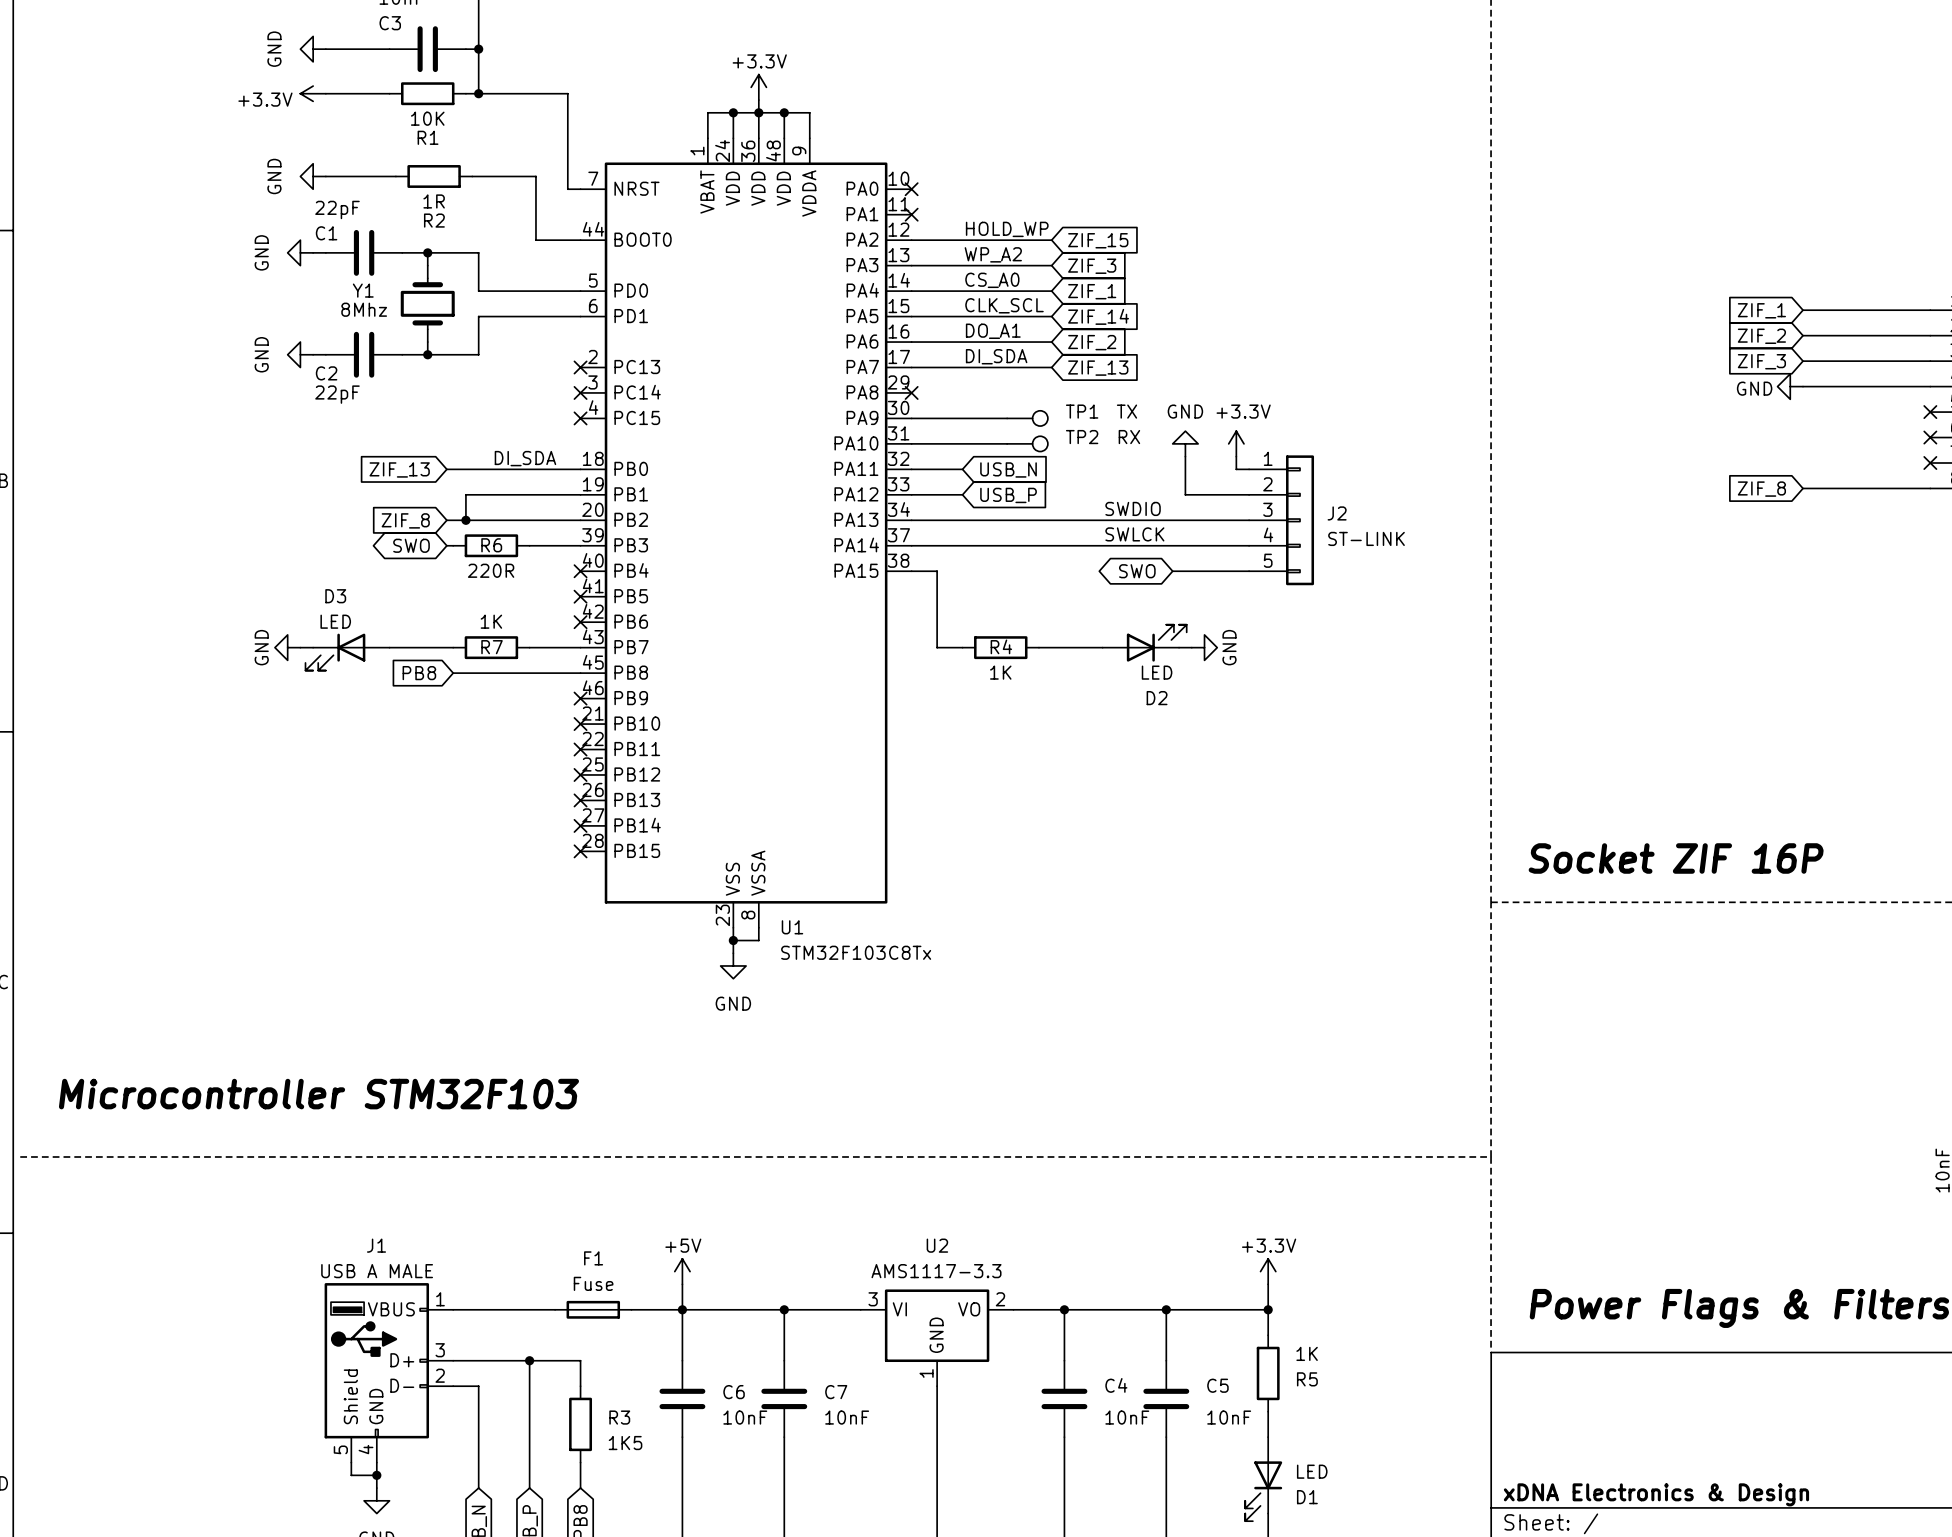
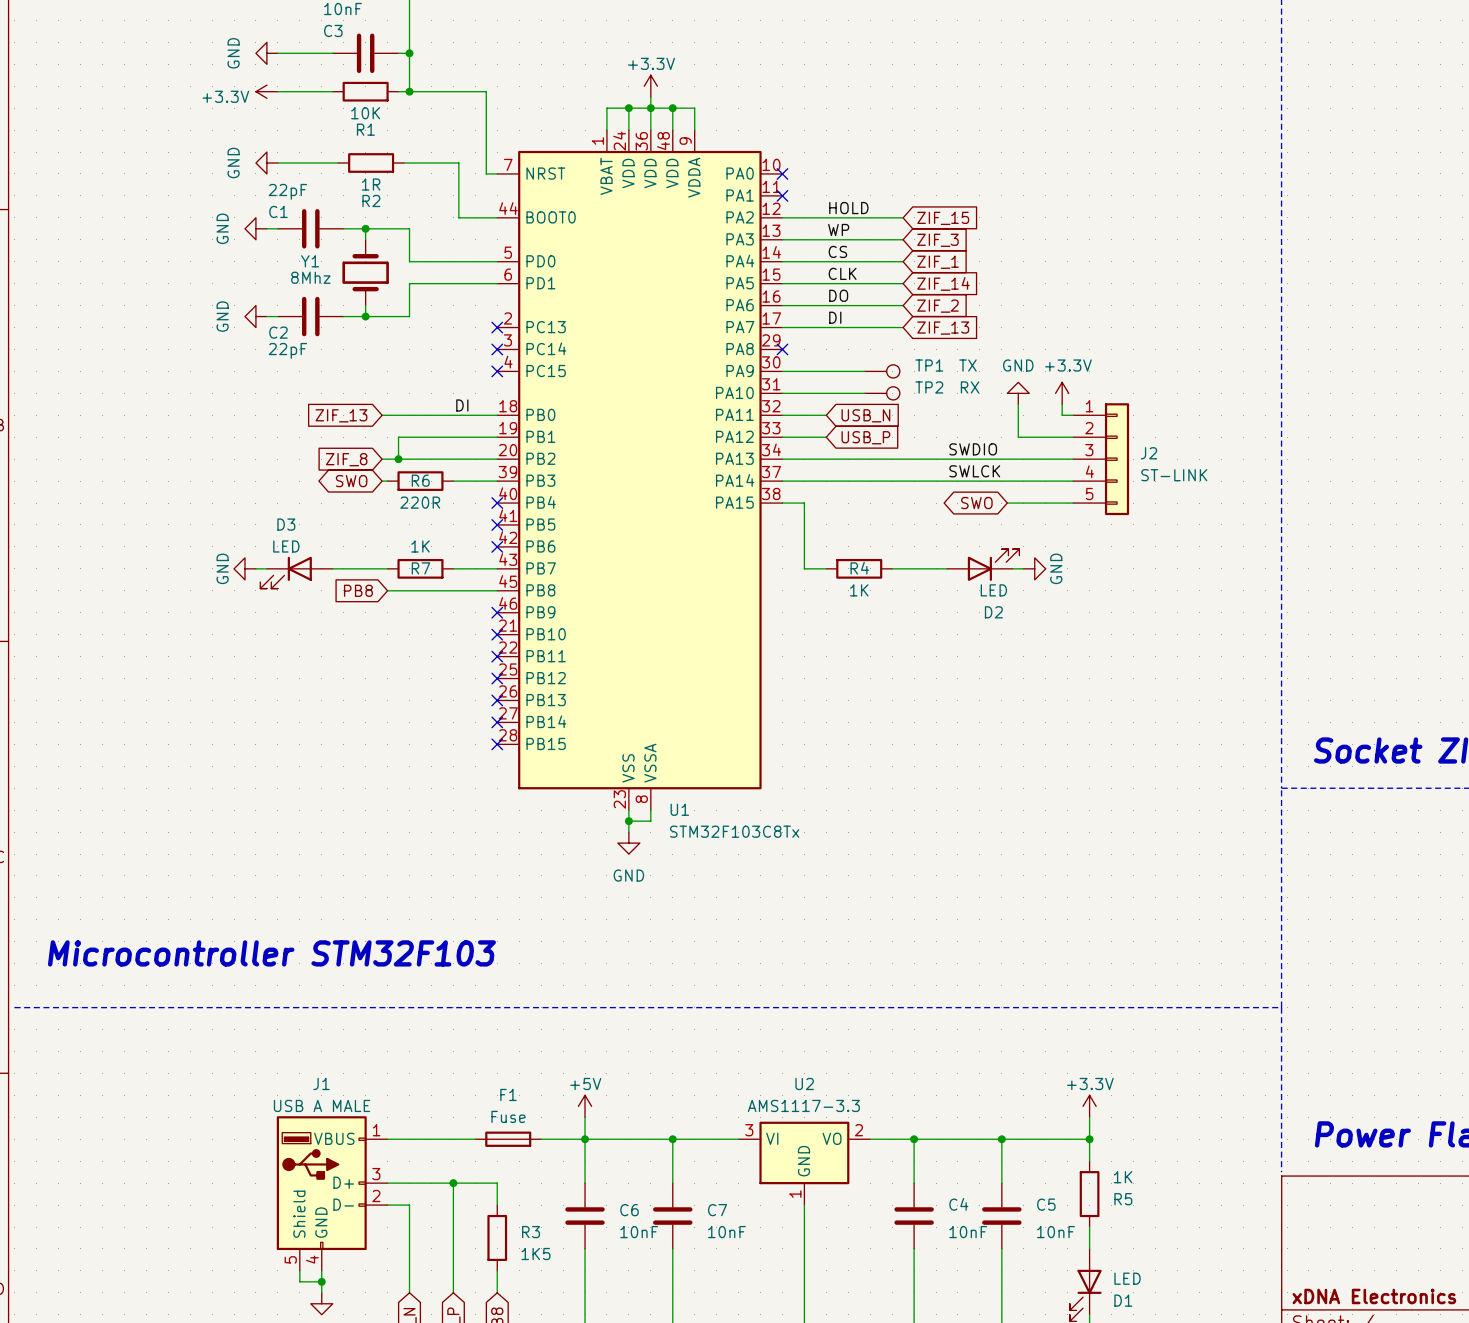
label: HOLD_WP (1007, 229) -> HOLD (848, 208)
label: WP_A2 (993, 254) -> WP (838, 229)
label: CS_A0 (992, 280) -> CS (837, 251)
label: CLK_SCL (1004, 305) -> CLK (842, 273)
label: DO_A1 (993, 331) -> DO (838, 295)
label: DI_SDA (996, 356) -> DI (835, 317)
label: DI_SDA (525, 458) -> none
label: none -> DI (462, 405)

